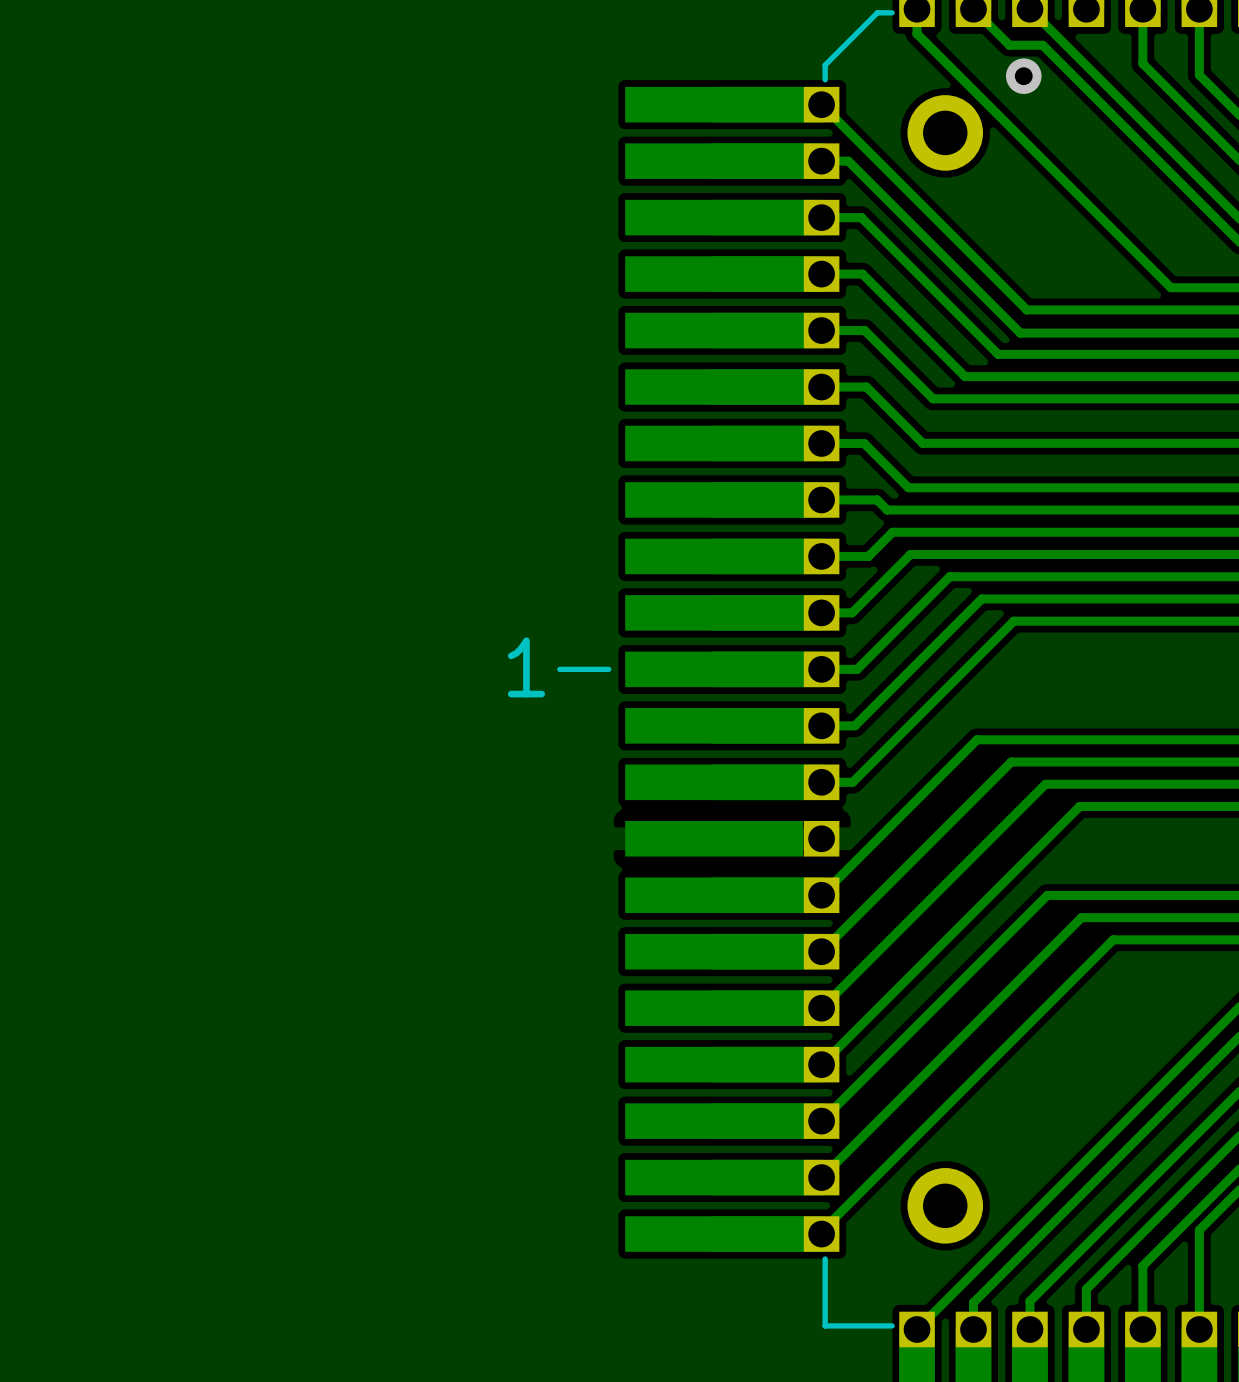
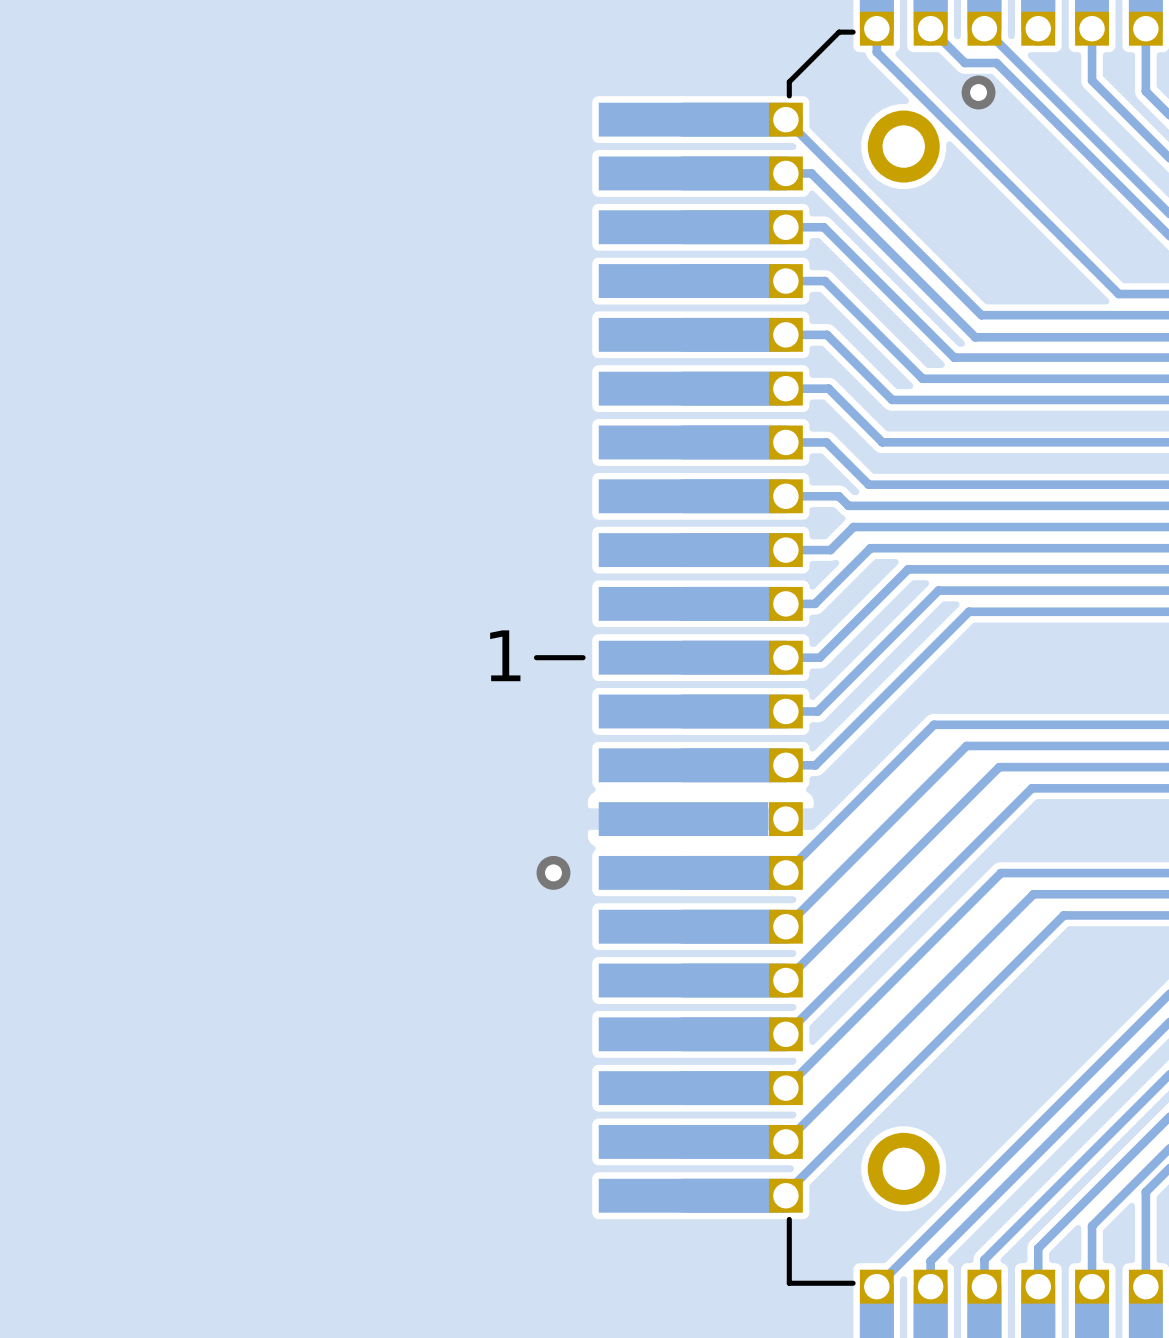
via: none -> (553, 872)

